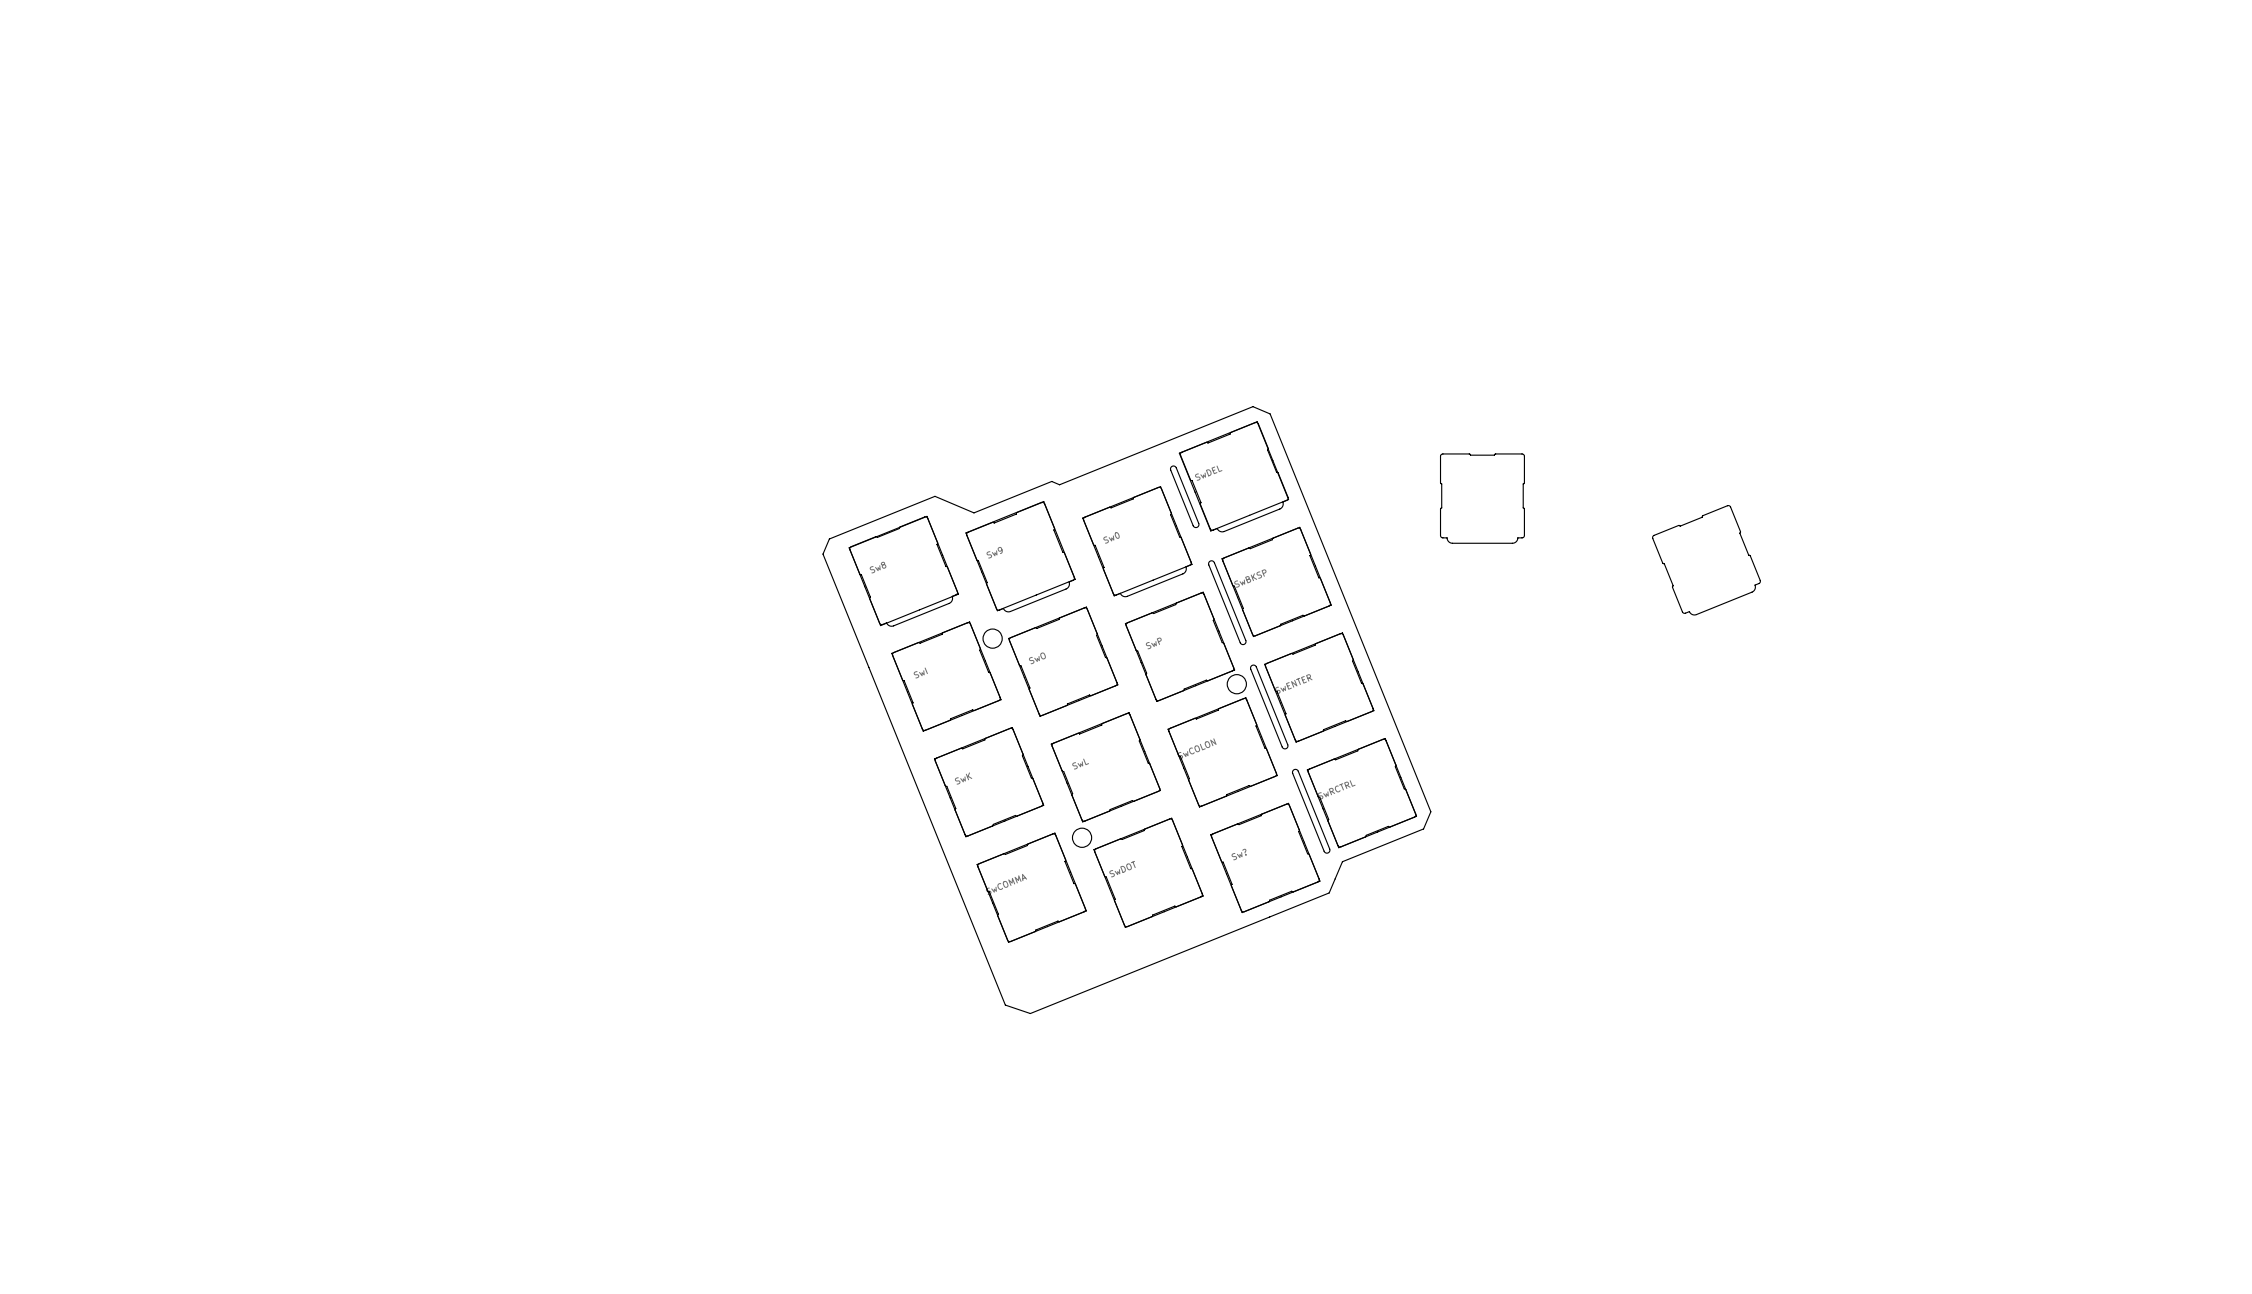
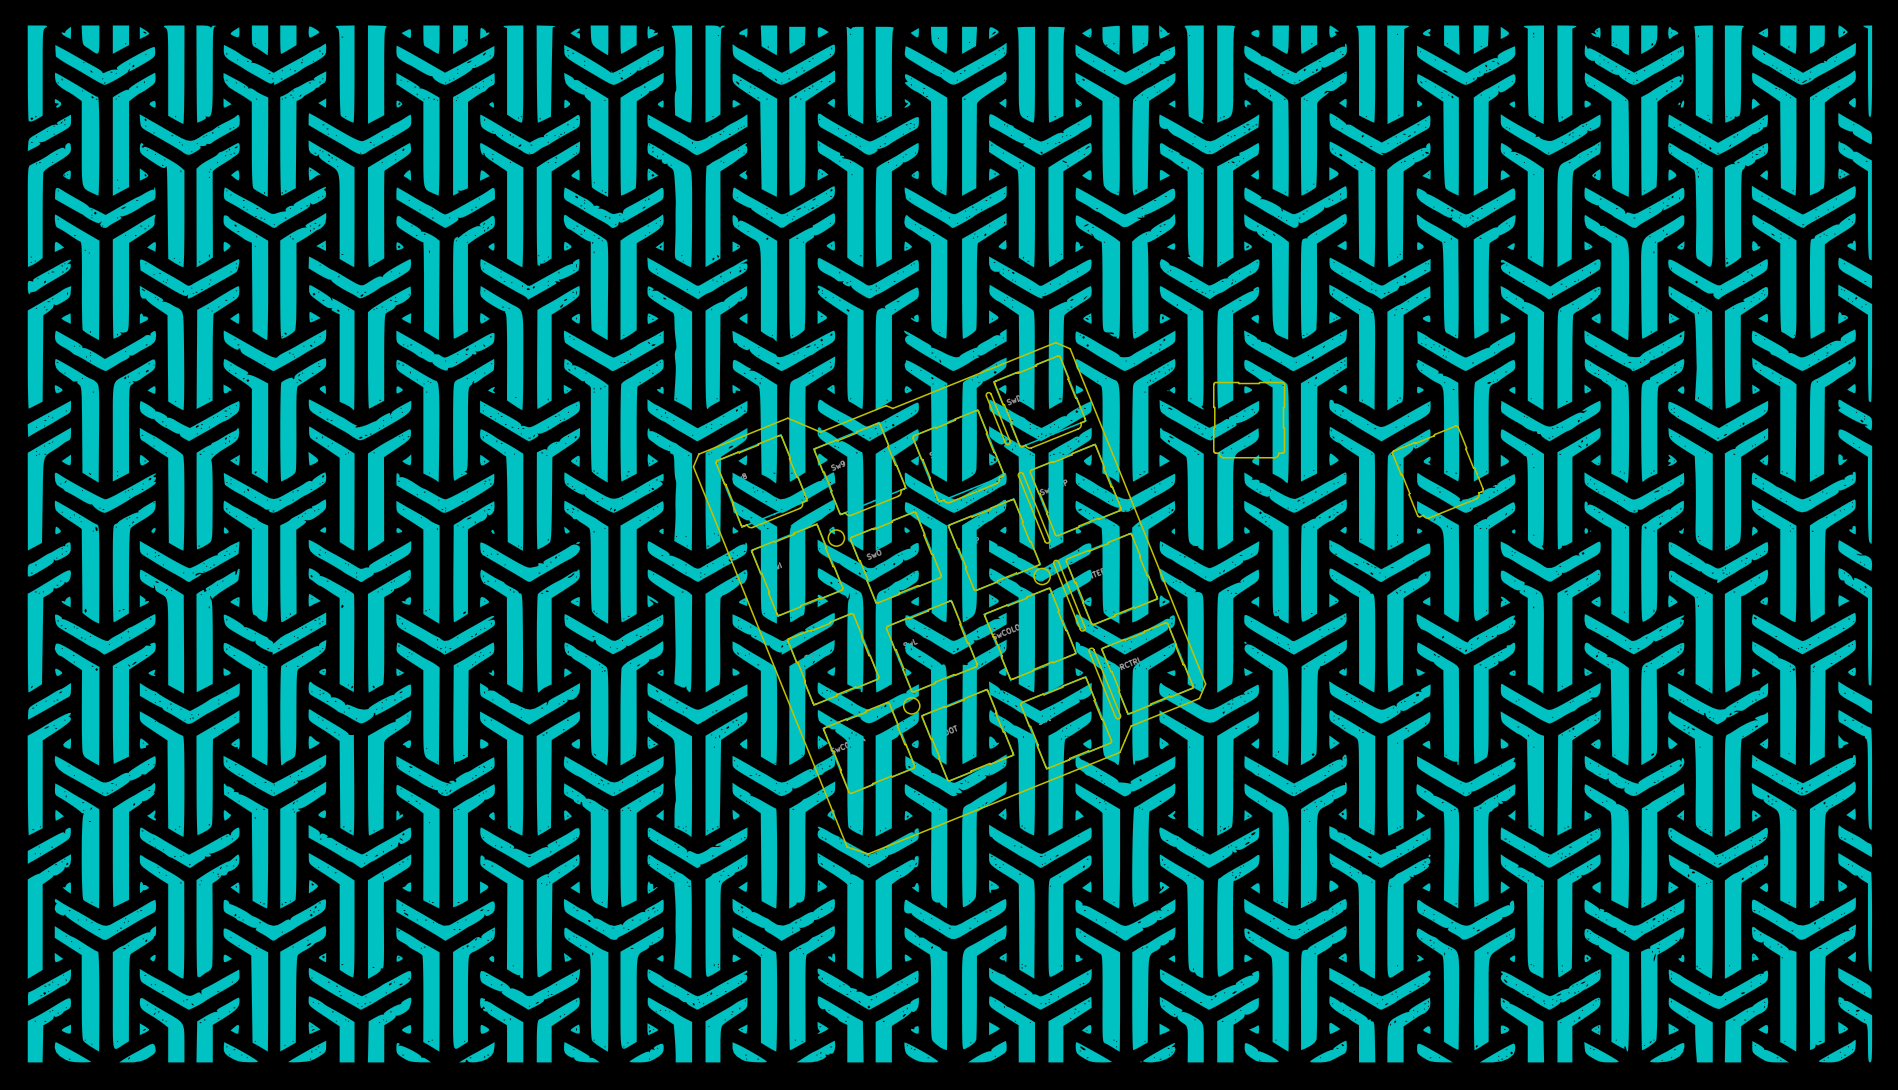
drawing: none -> [27, 25, 1873, 1063]

